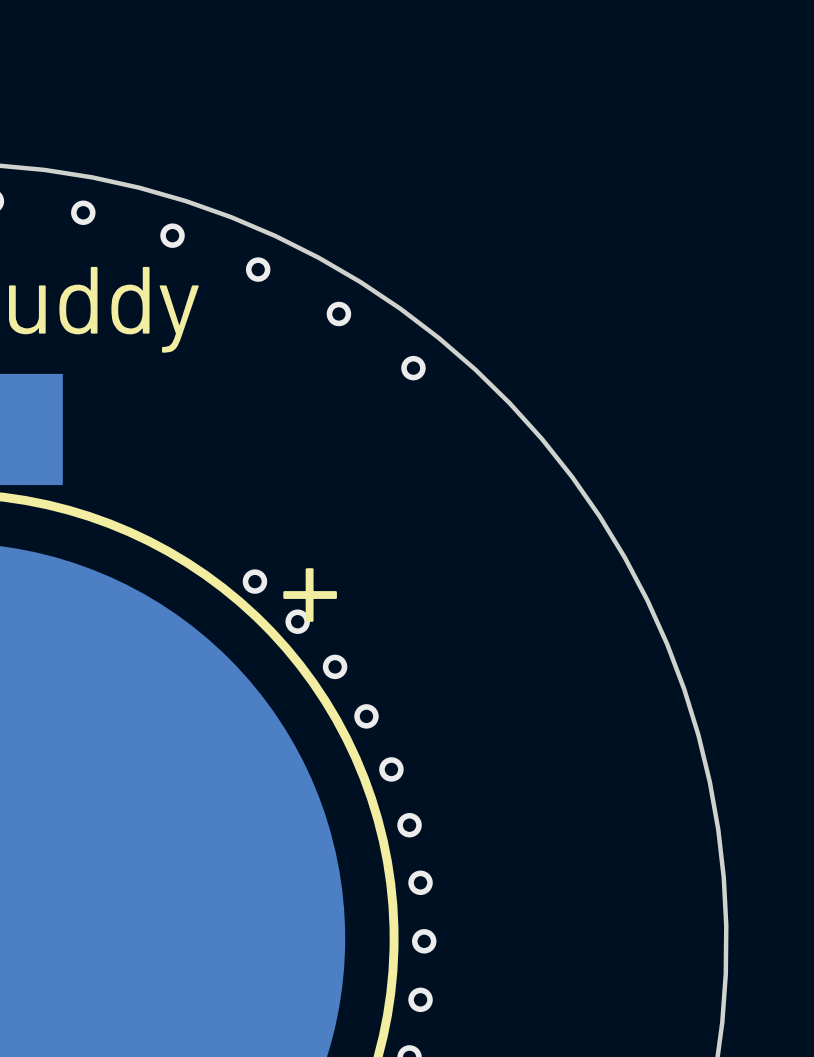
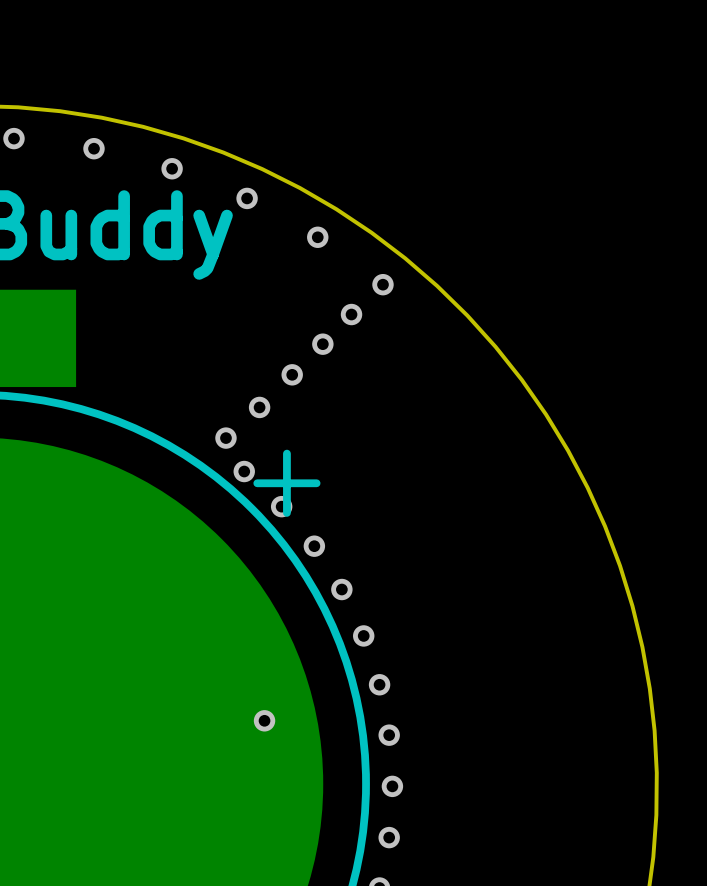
via: none -> (351, 314)
via: none -> (322, 344)
via: none -> (292, 374)
via: none -> (259, 407)
via: none -> (225, 438)
via: none -> (264, 720)

